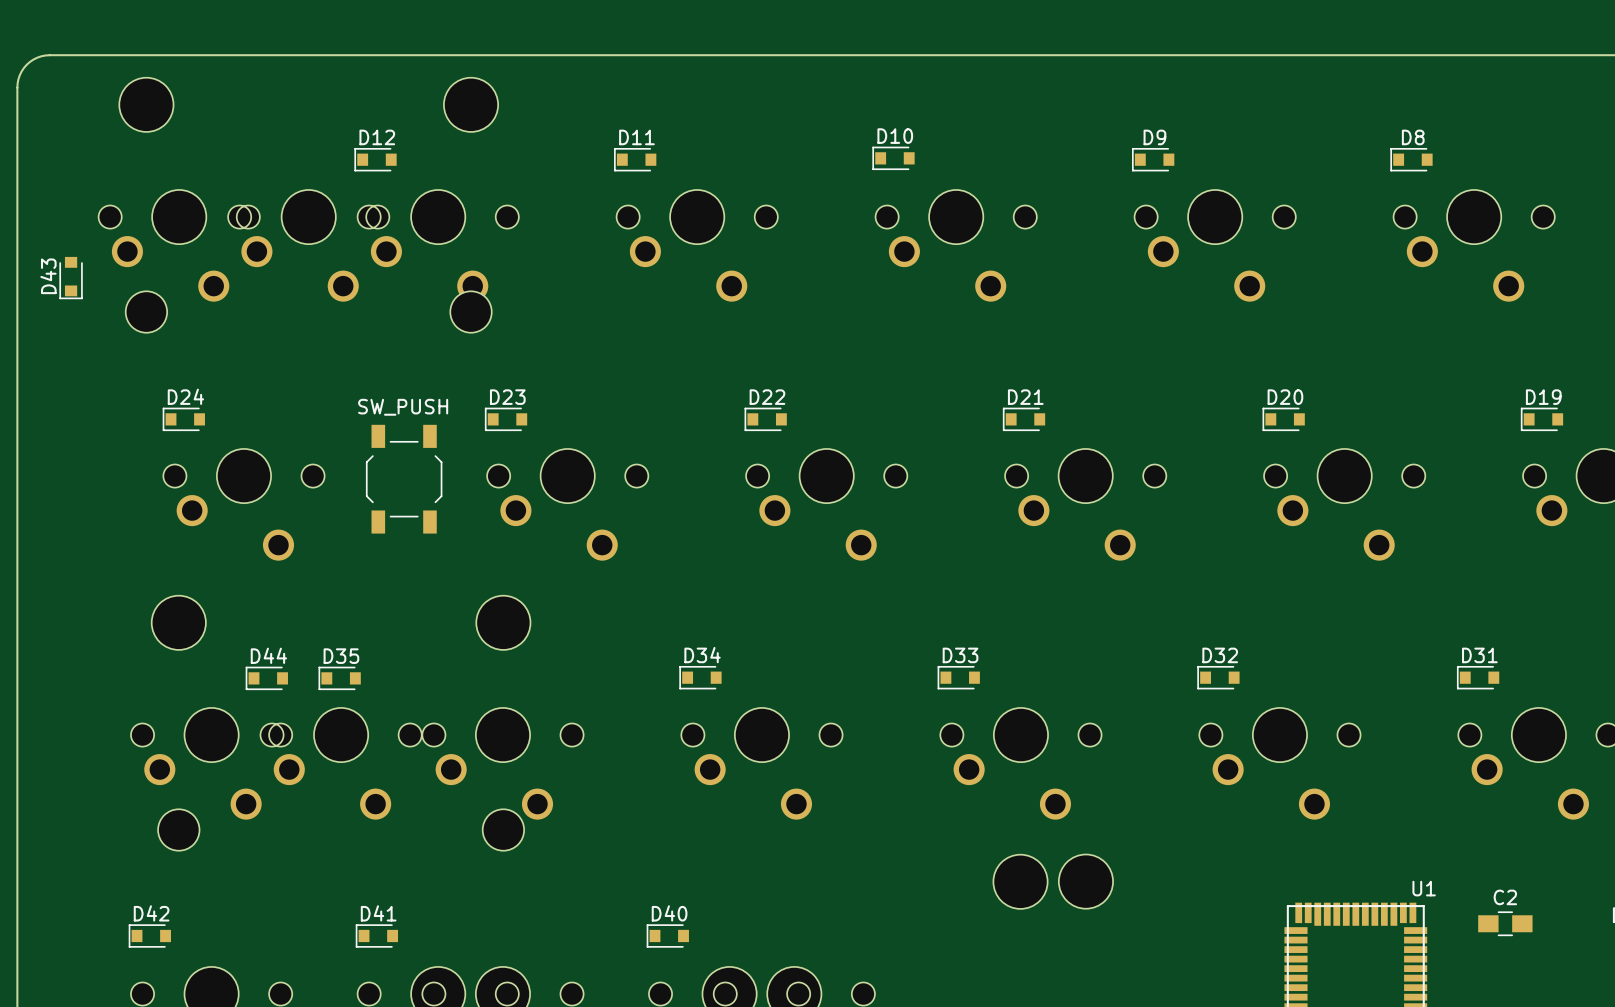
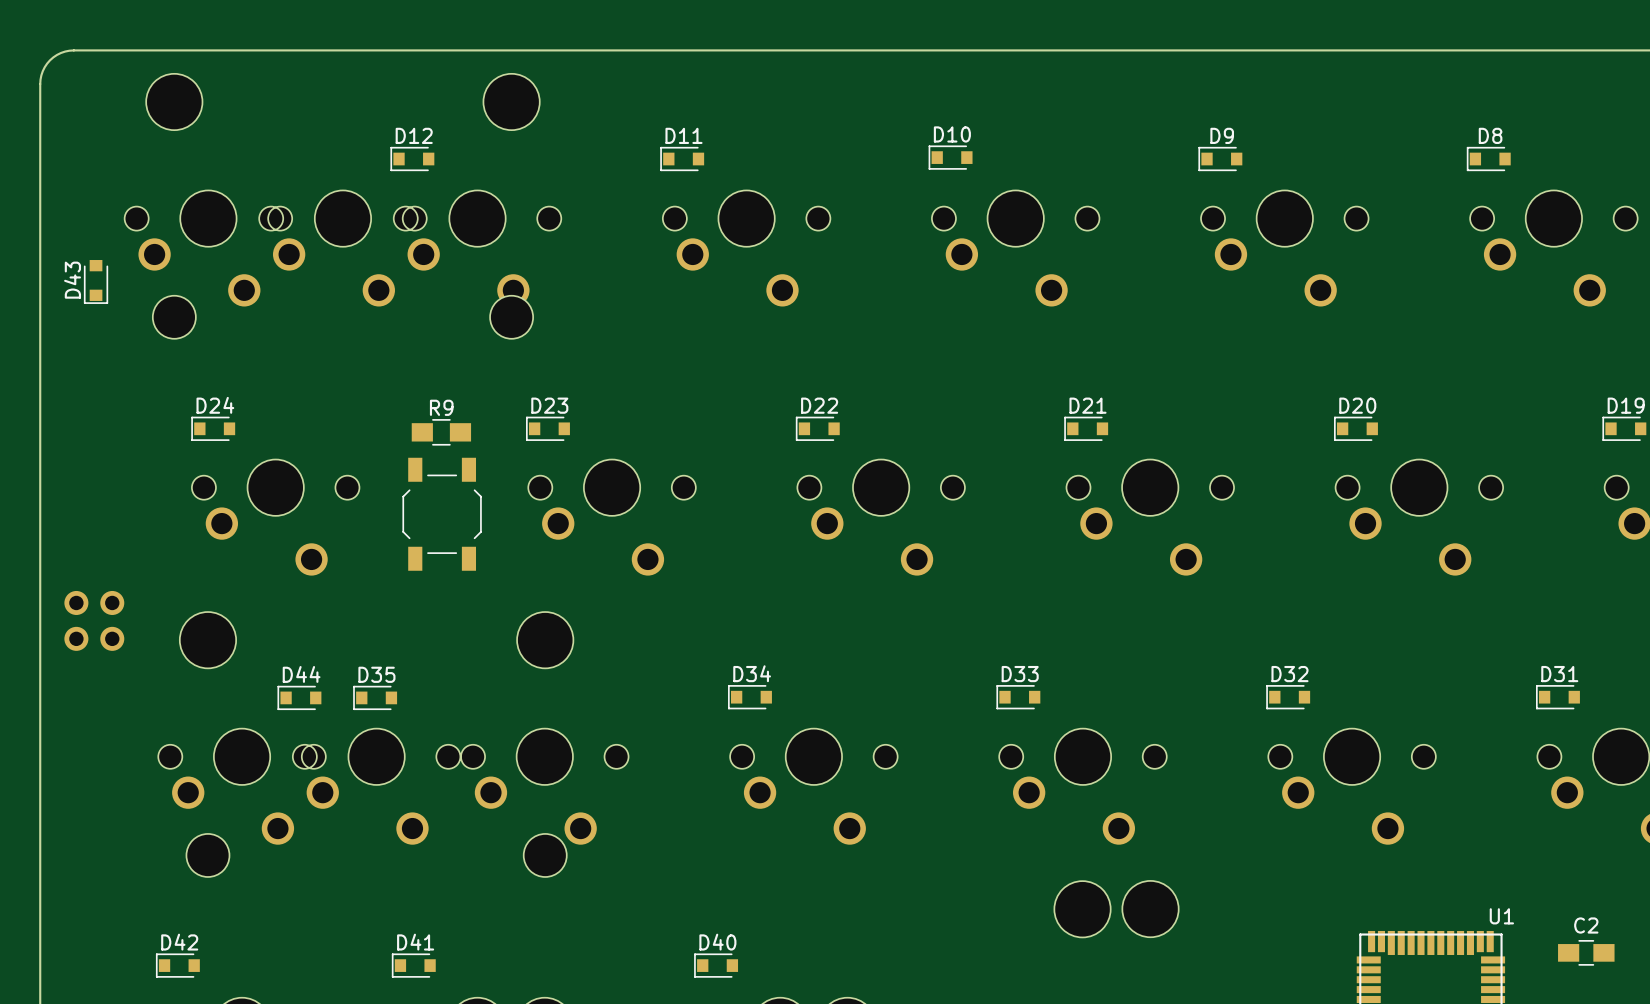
R9: none -> (441, 432)
part: SW_PUSH (404, 479) -> none
part: none -> (442, 514)
part: none -> (94, 620)

